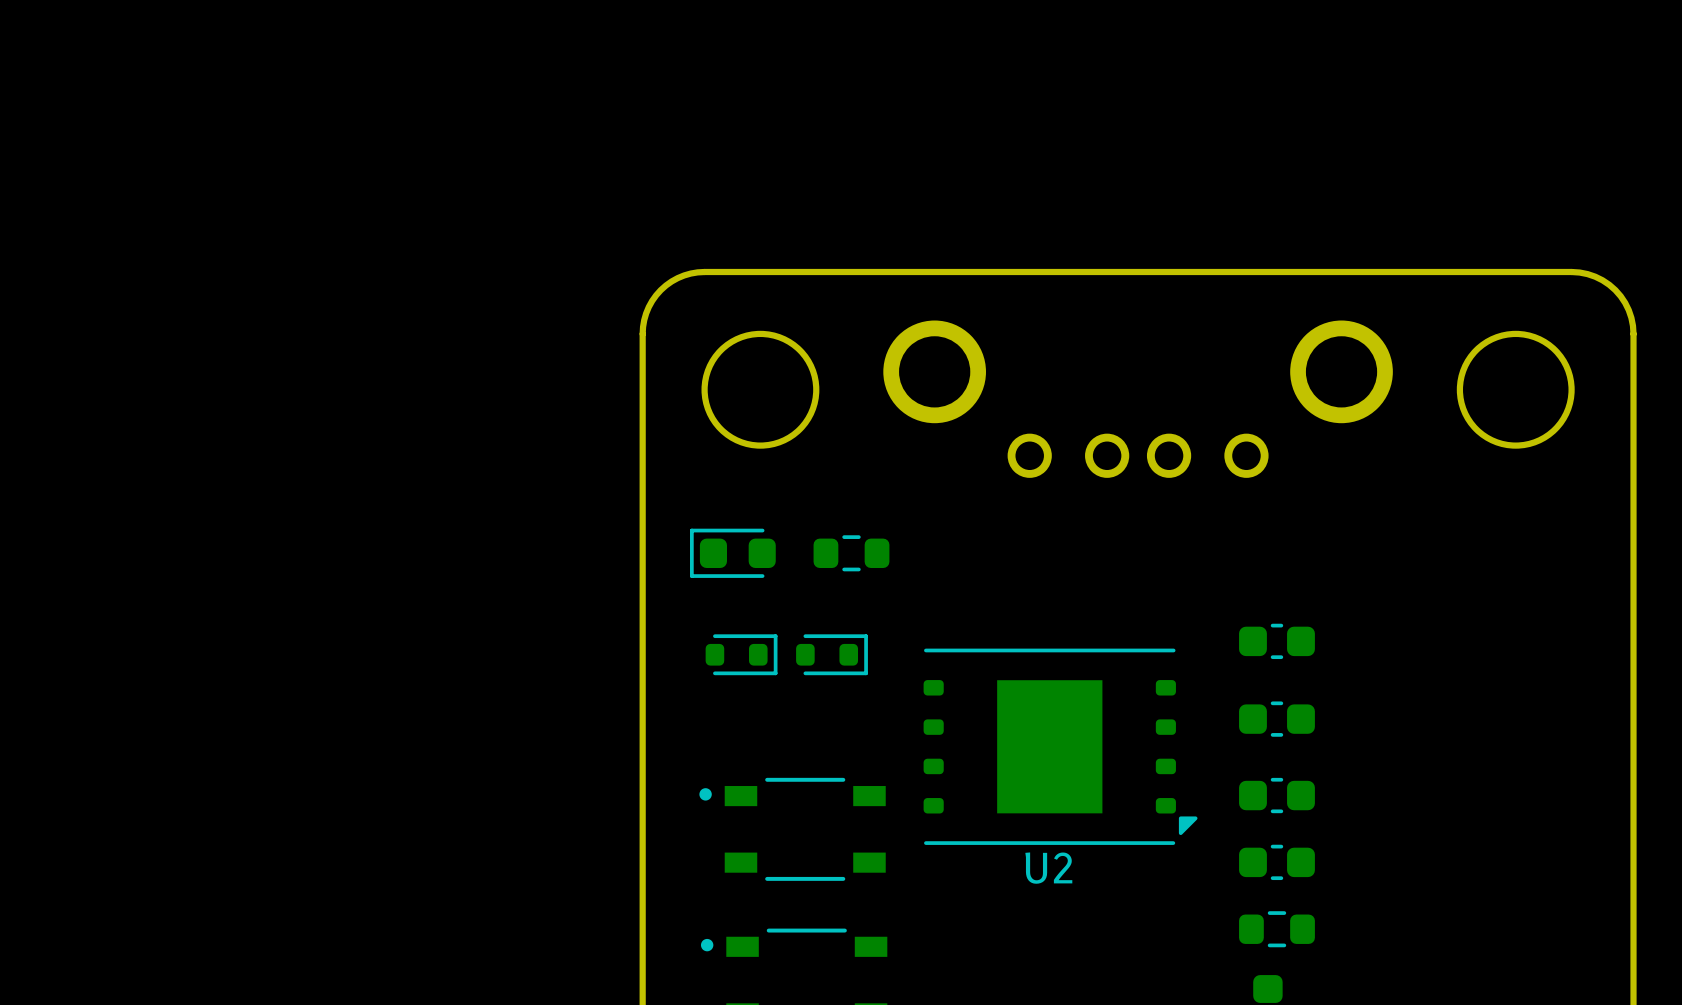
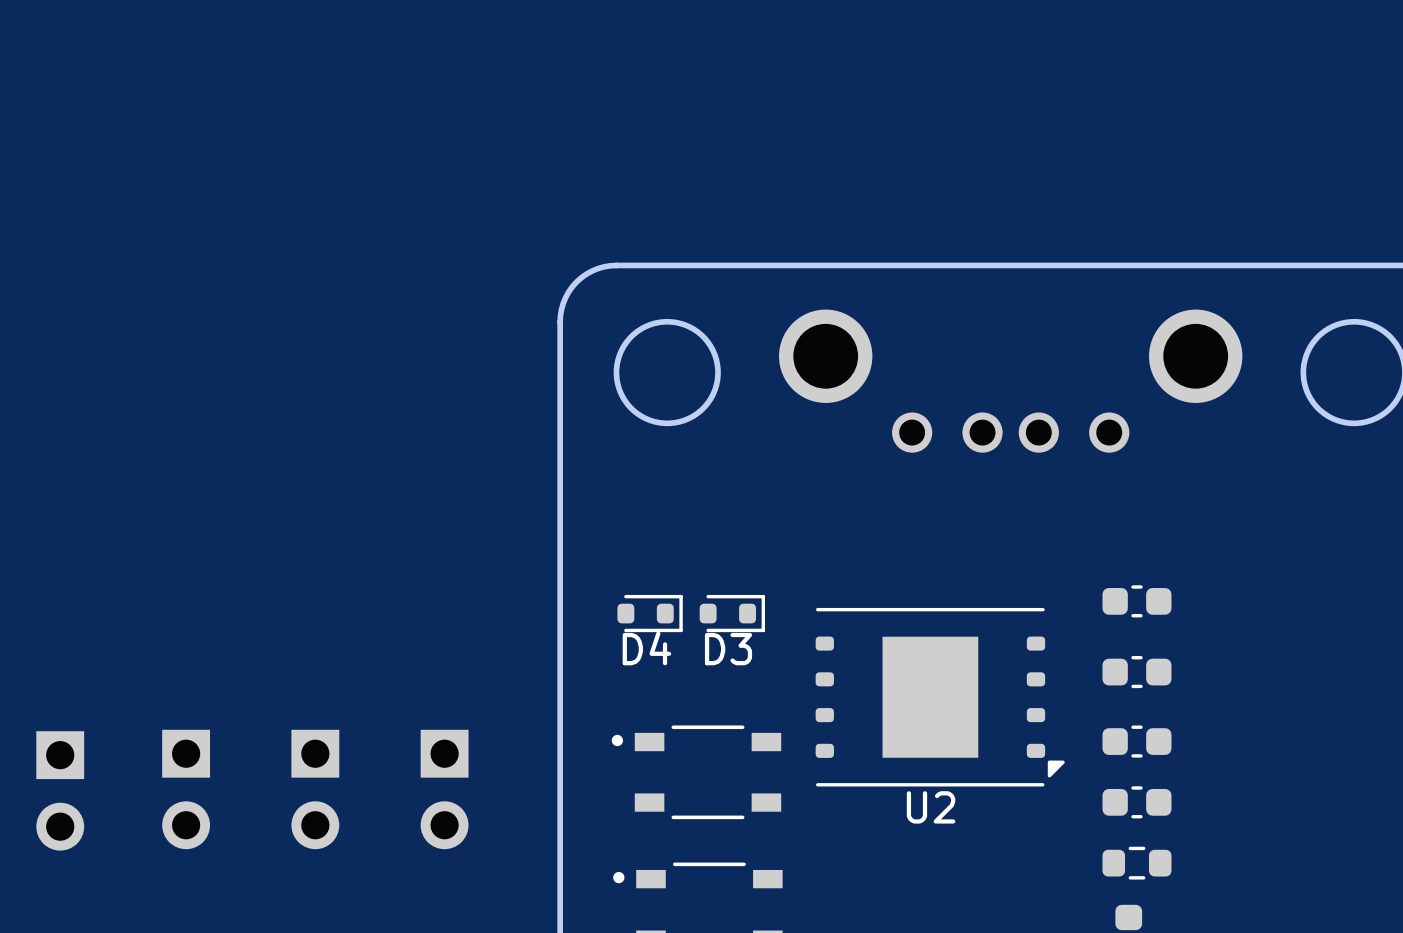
part: (732, 553) -> none
part: (851, 553) -> none
D4 name: none -> D4 (646, 648)
D3 name: none -> D3 (728, 649)
part: none -> (186, 789)
part: none -> (315, 789)
part: none -> (444, 789)
part: none -> (60, 790)

